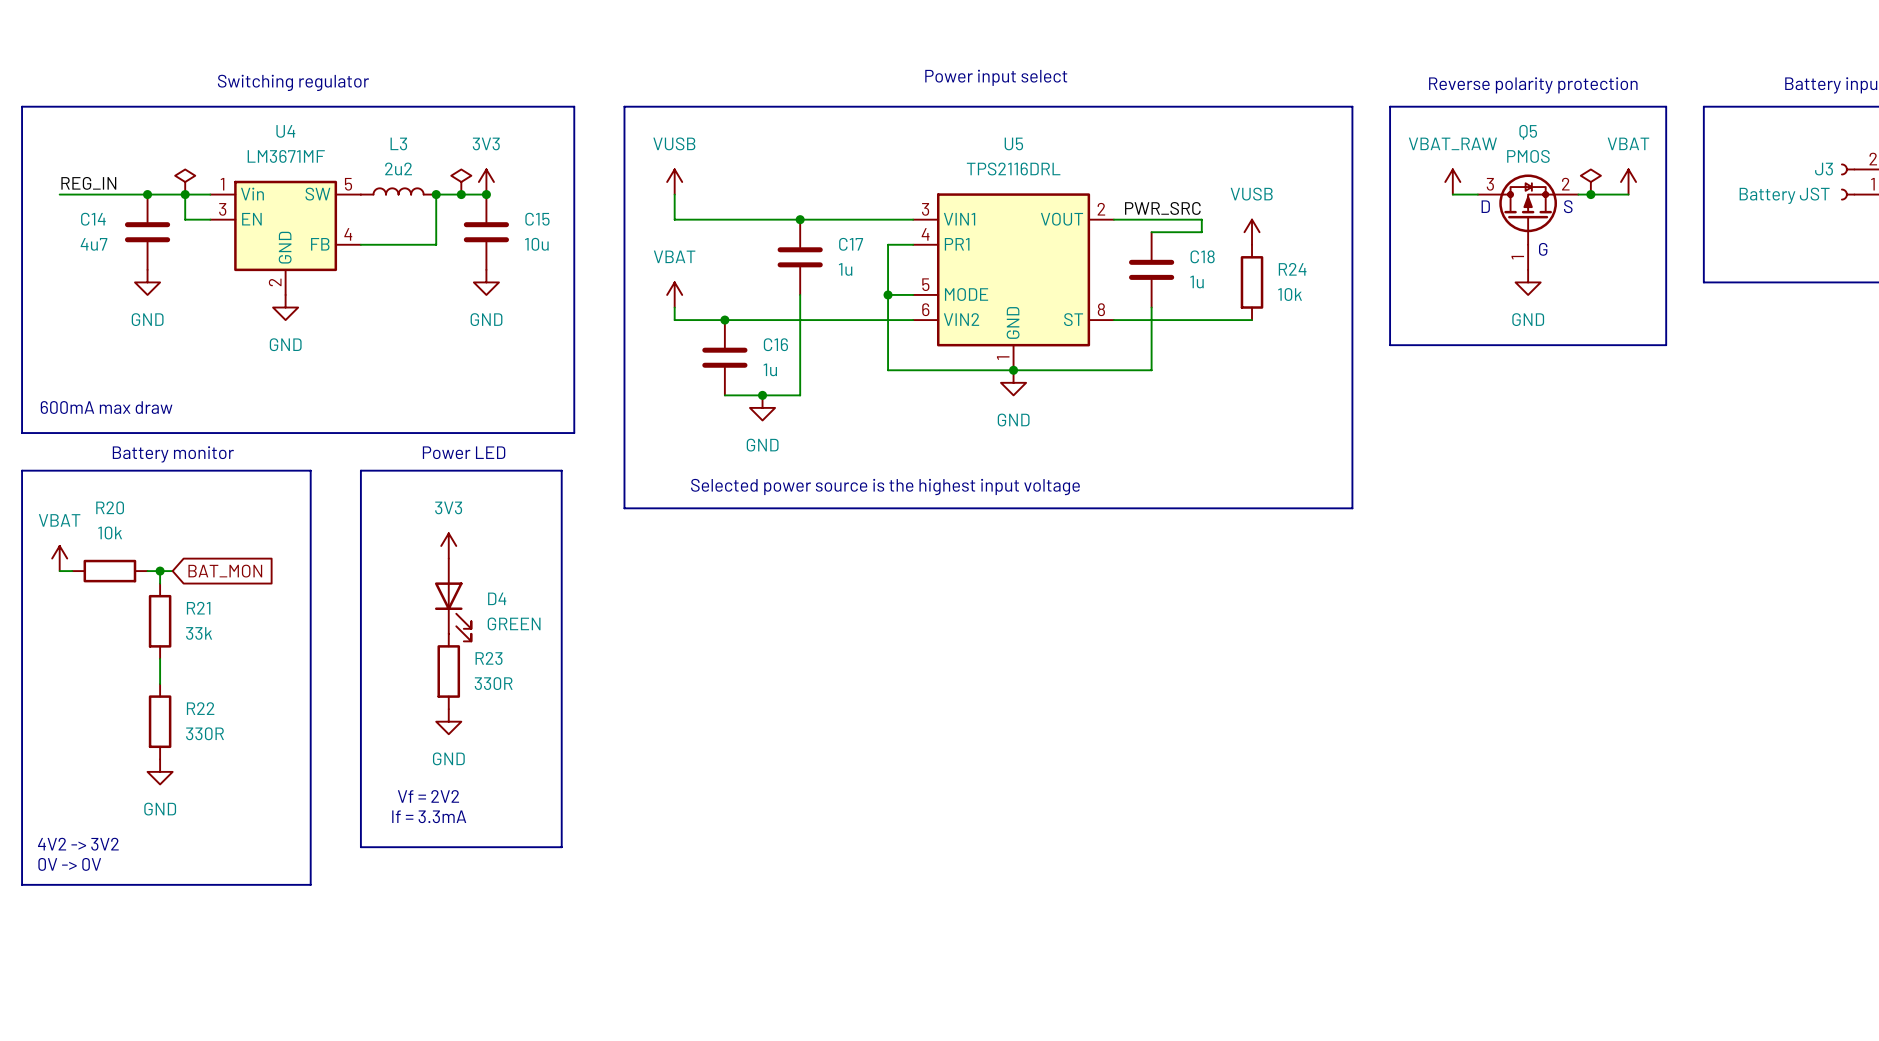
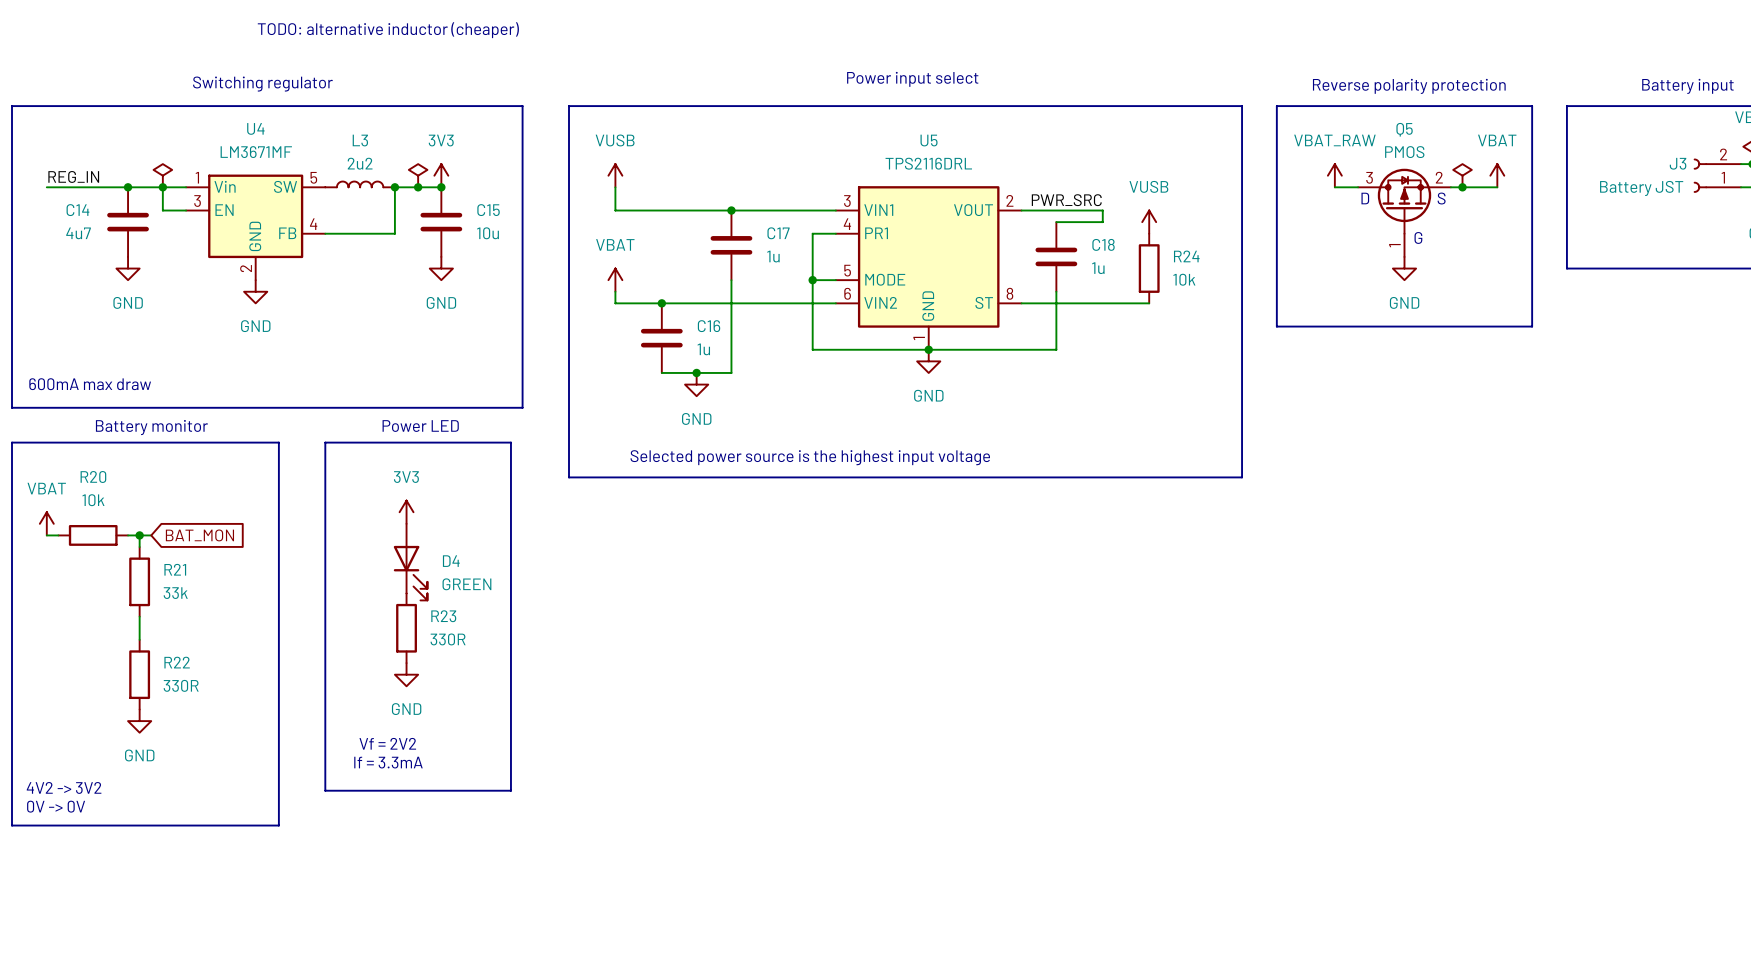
text: none -> TODO: alternative inductor (cheaper) (388, 30)

